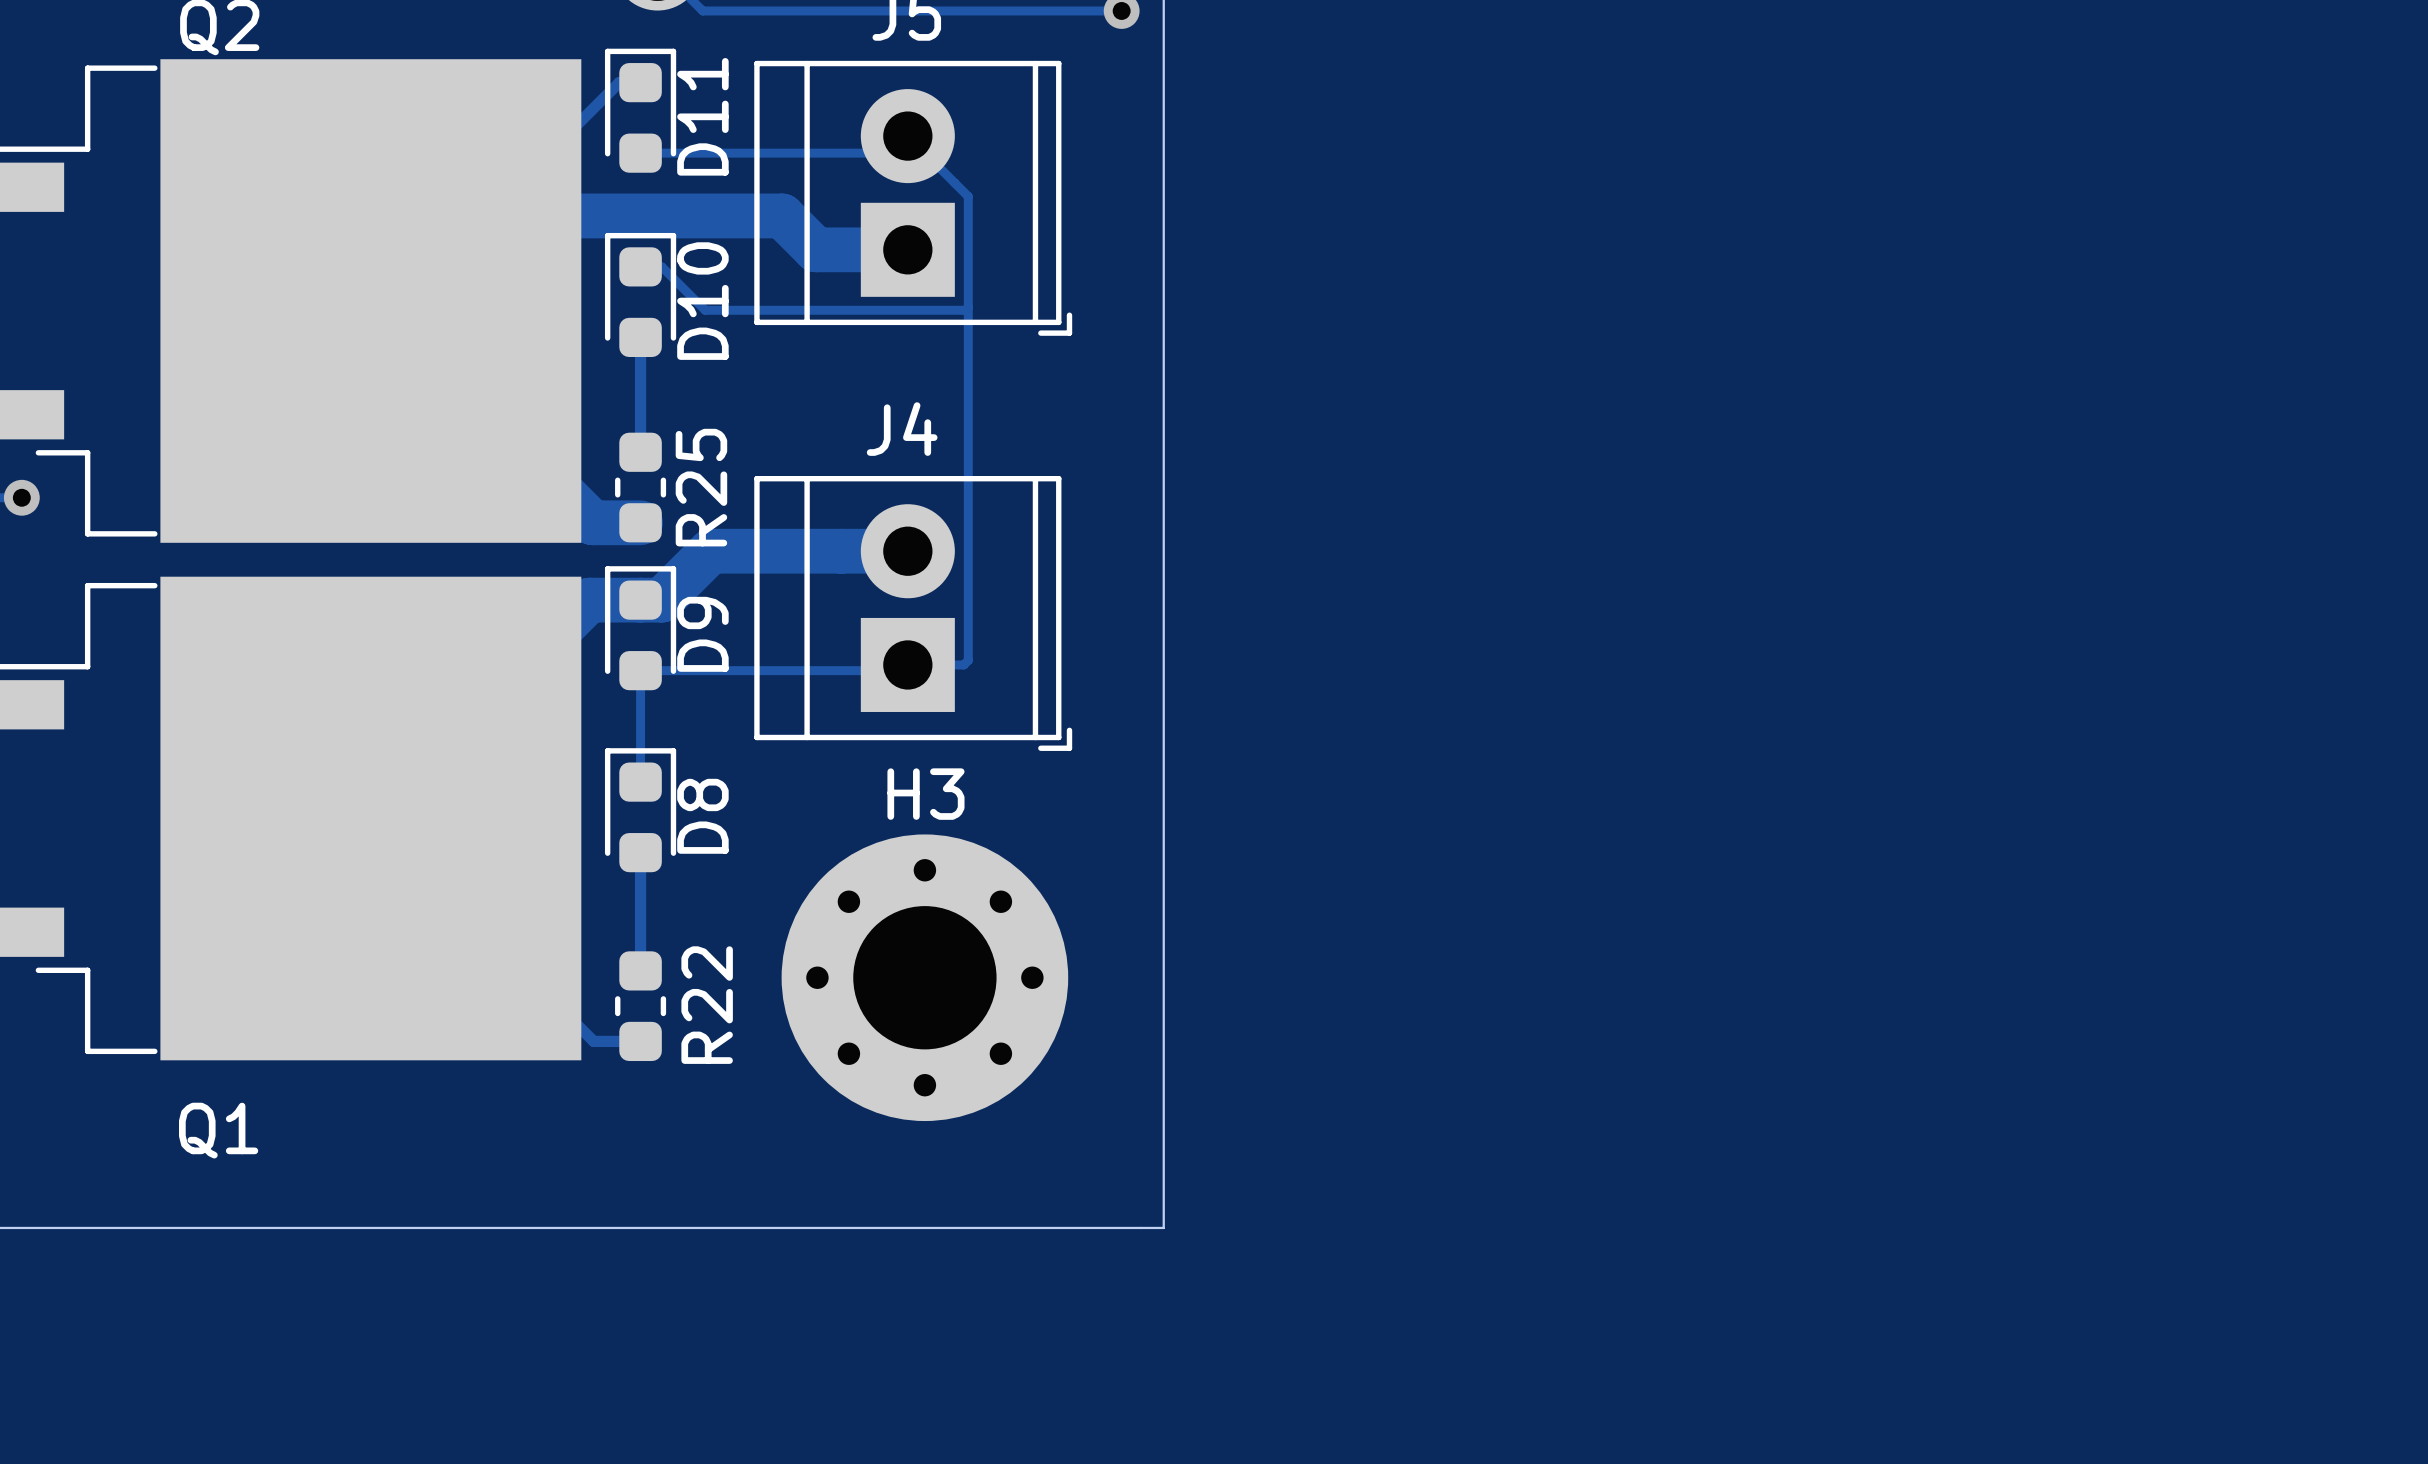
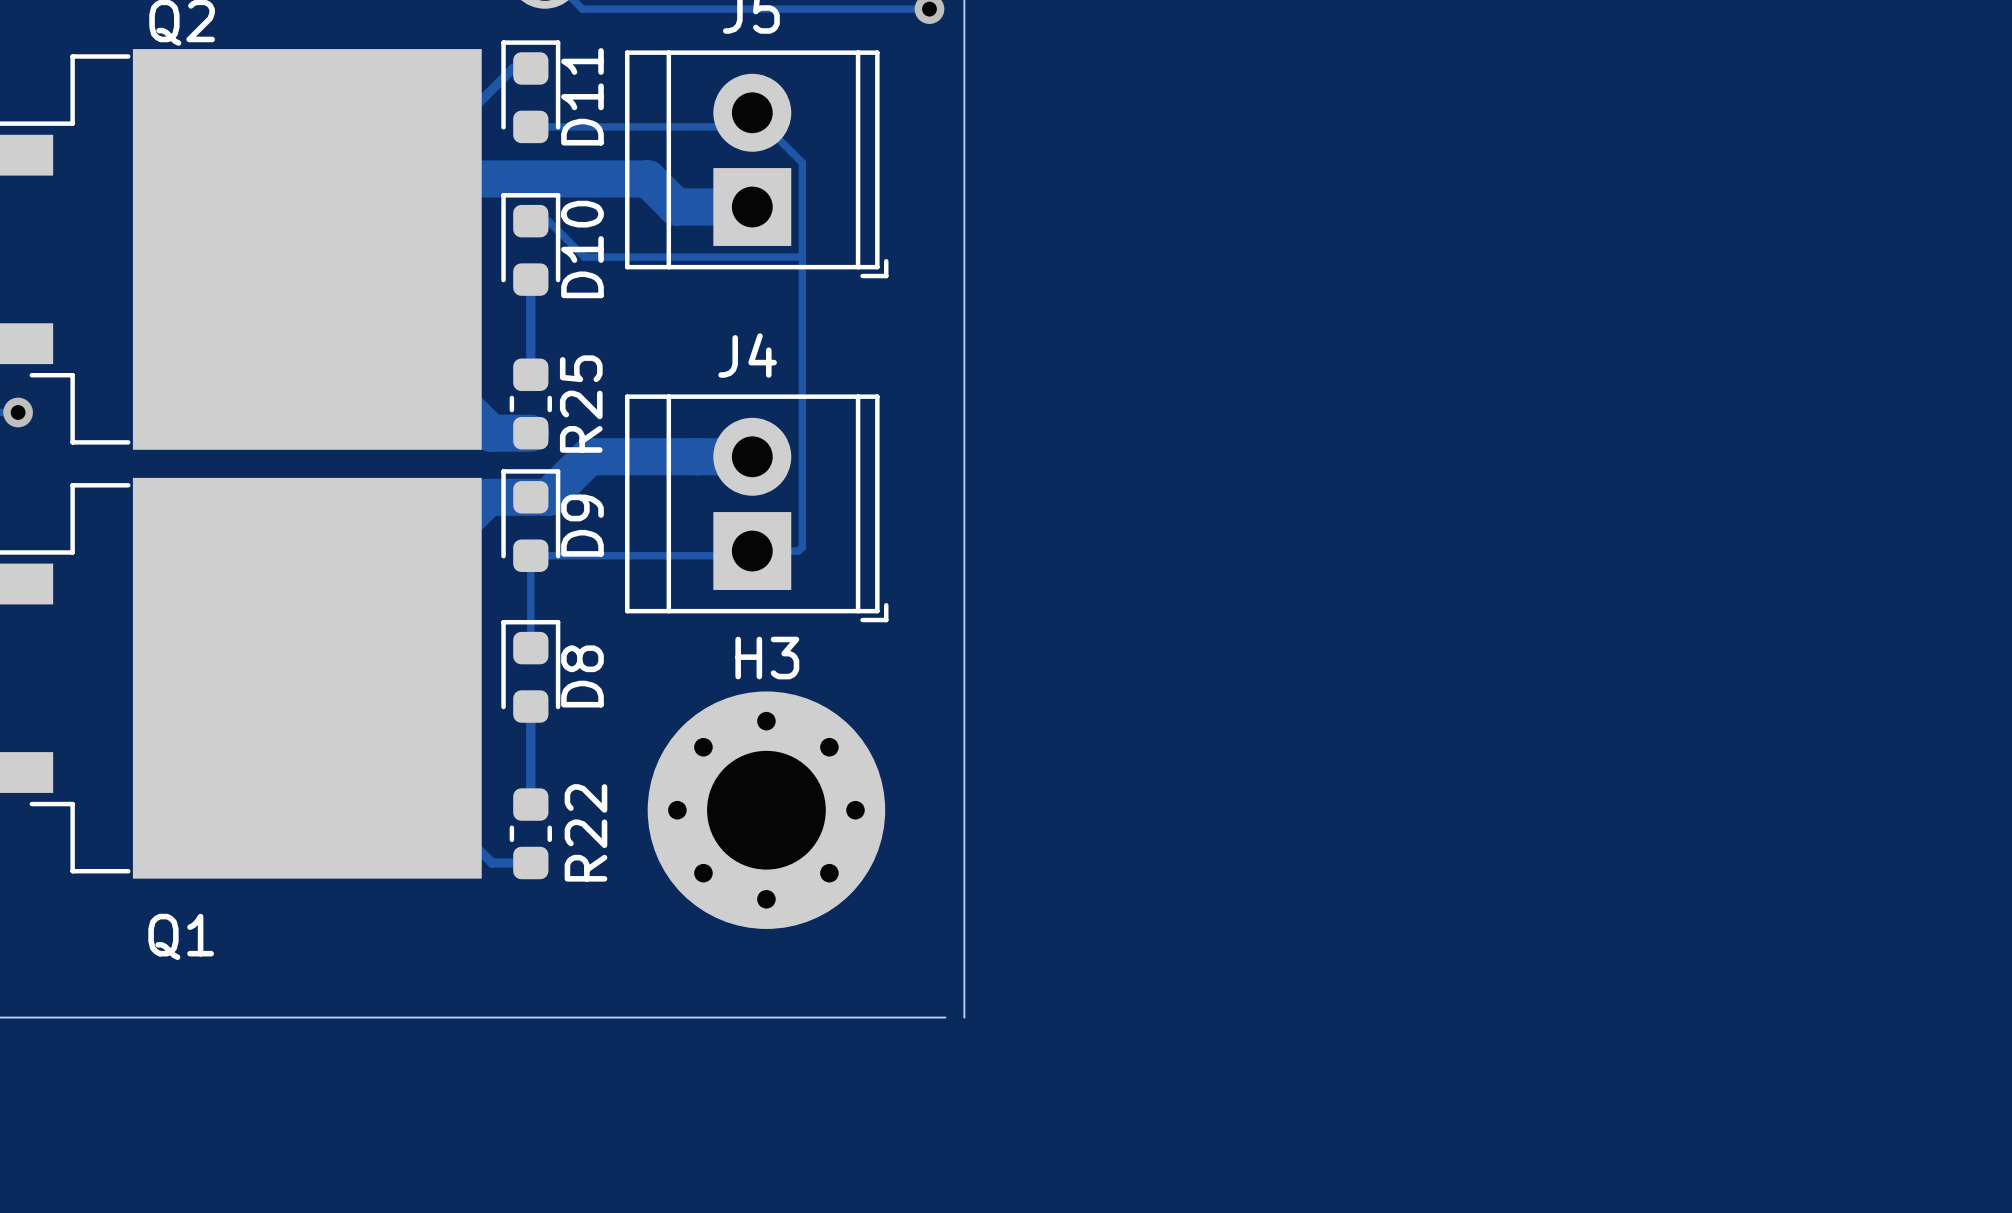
board edge: (1141, 1227) (1163, 1227) -> none

